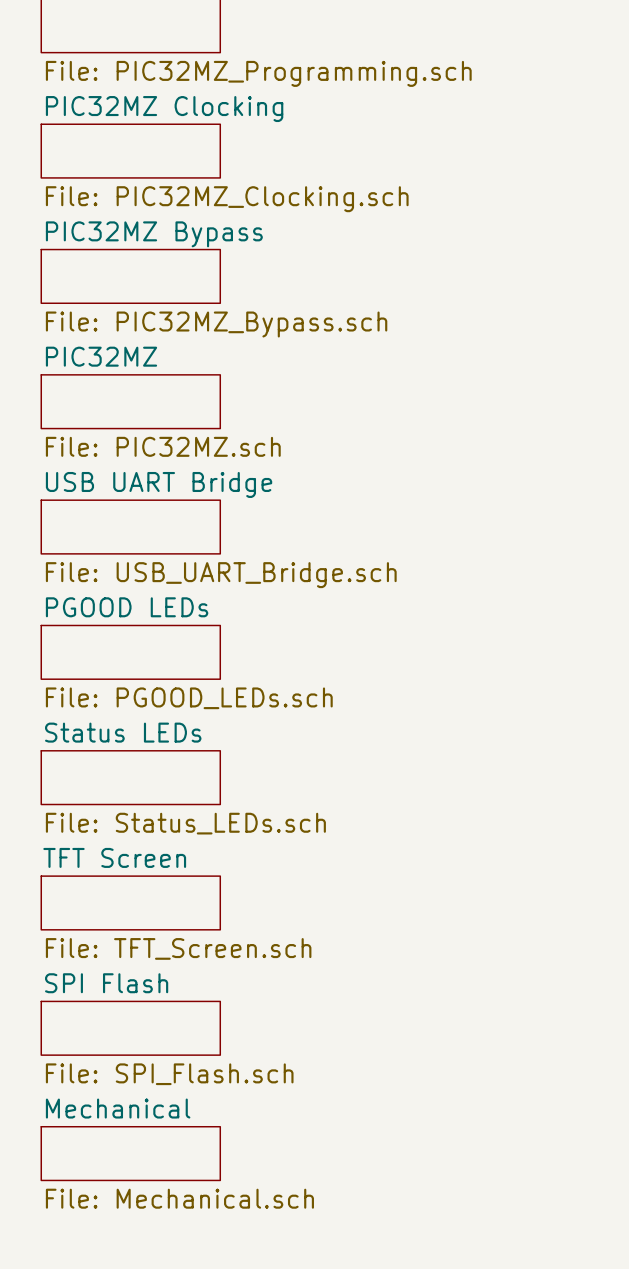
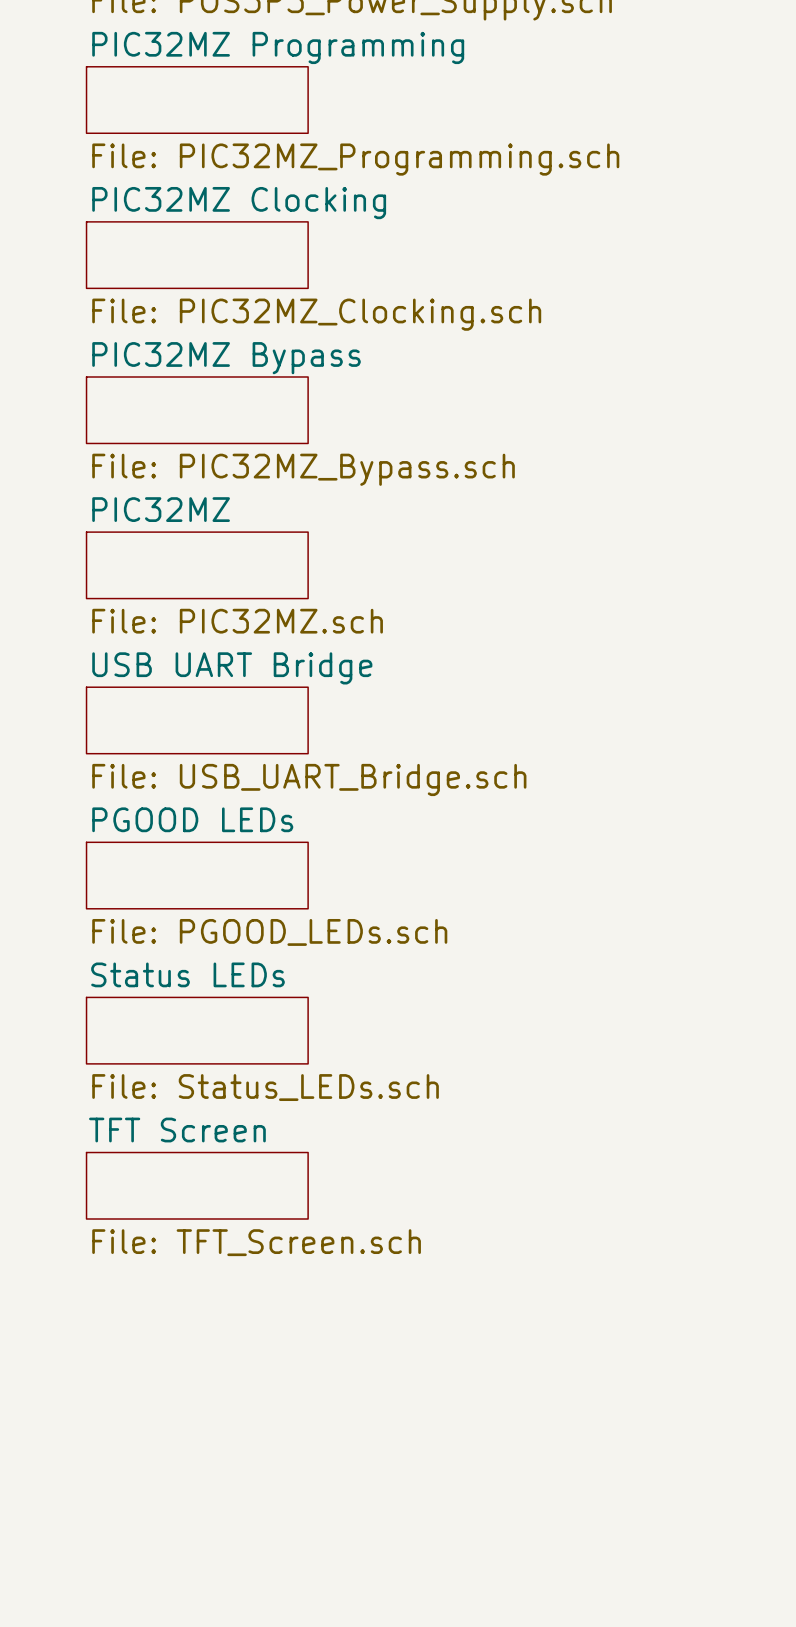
sheet SPI Flash: File: SPI_Flash.sch (130, 1028) -> none
sheet Mechanical: File: Mechanical.sch (130, 1153) -> none

